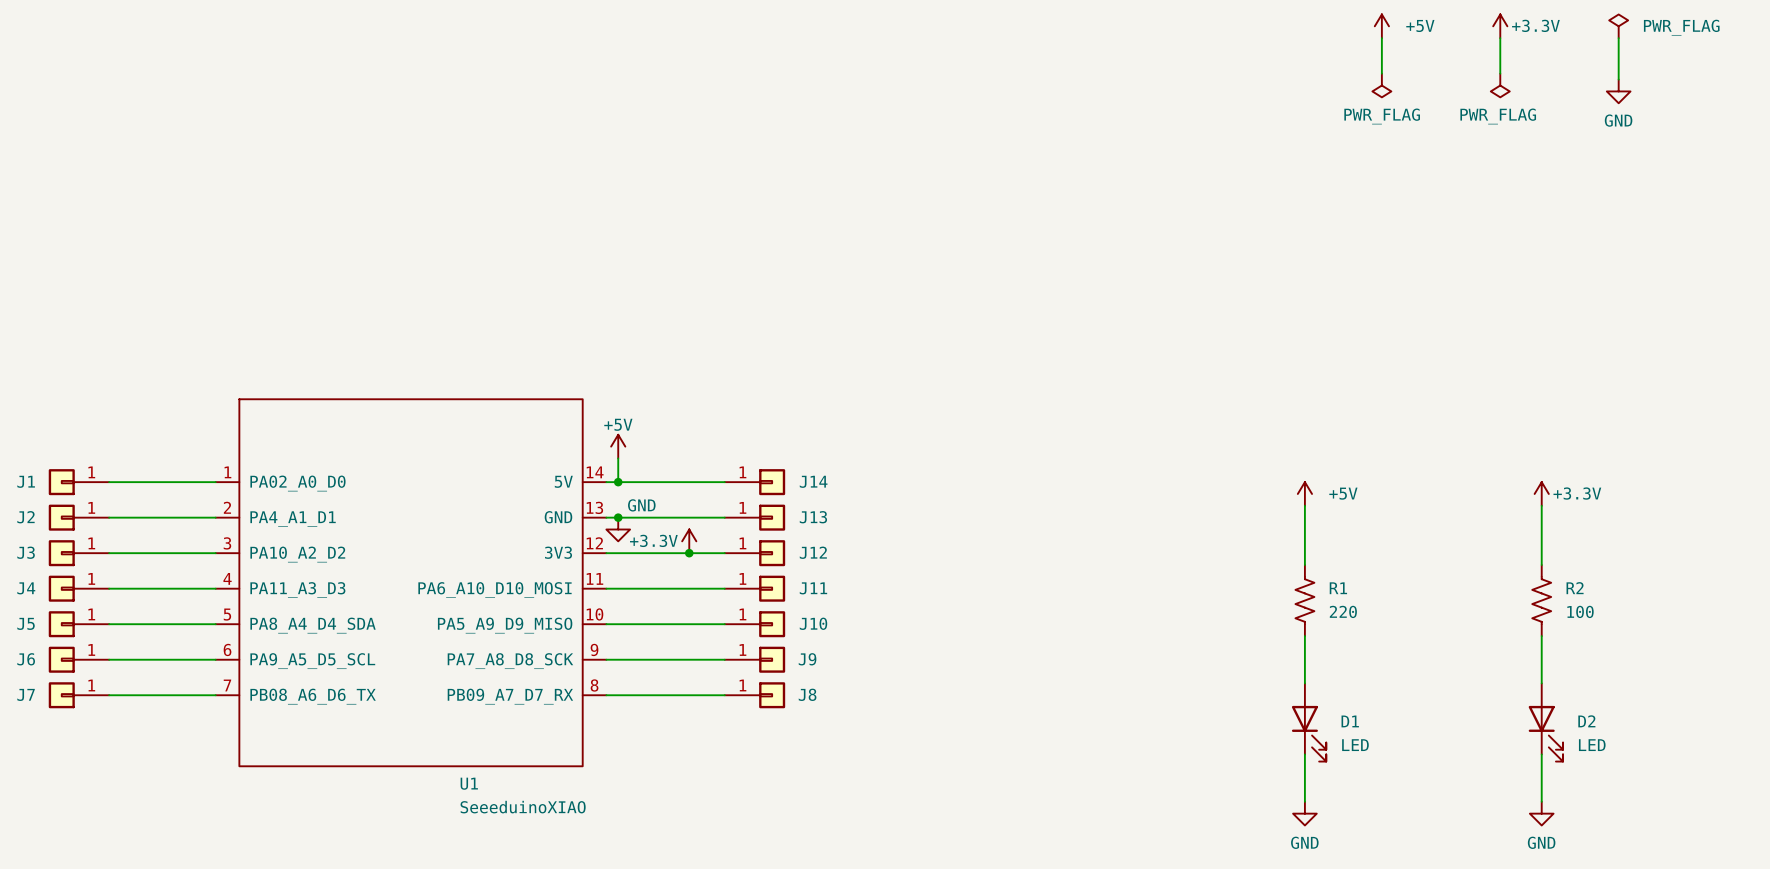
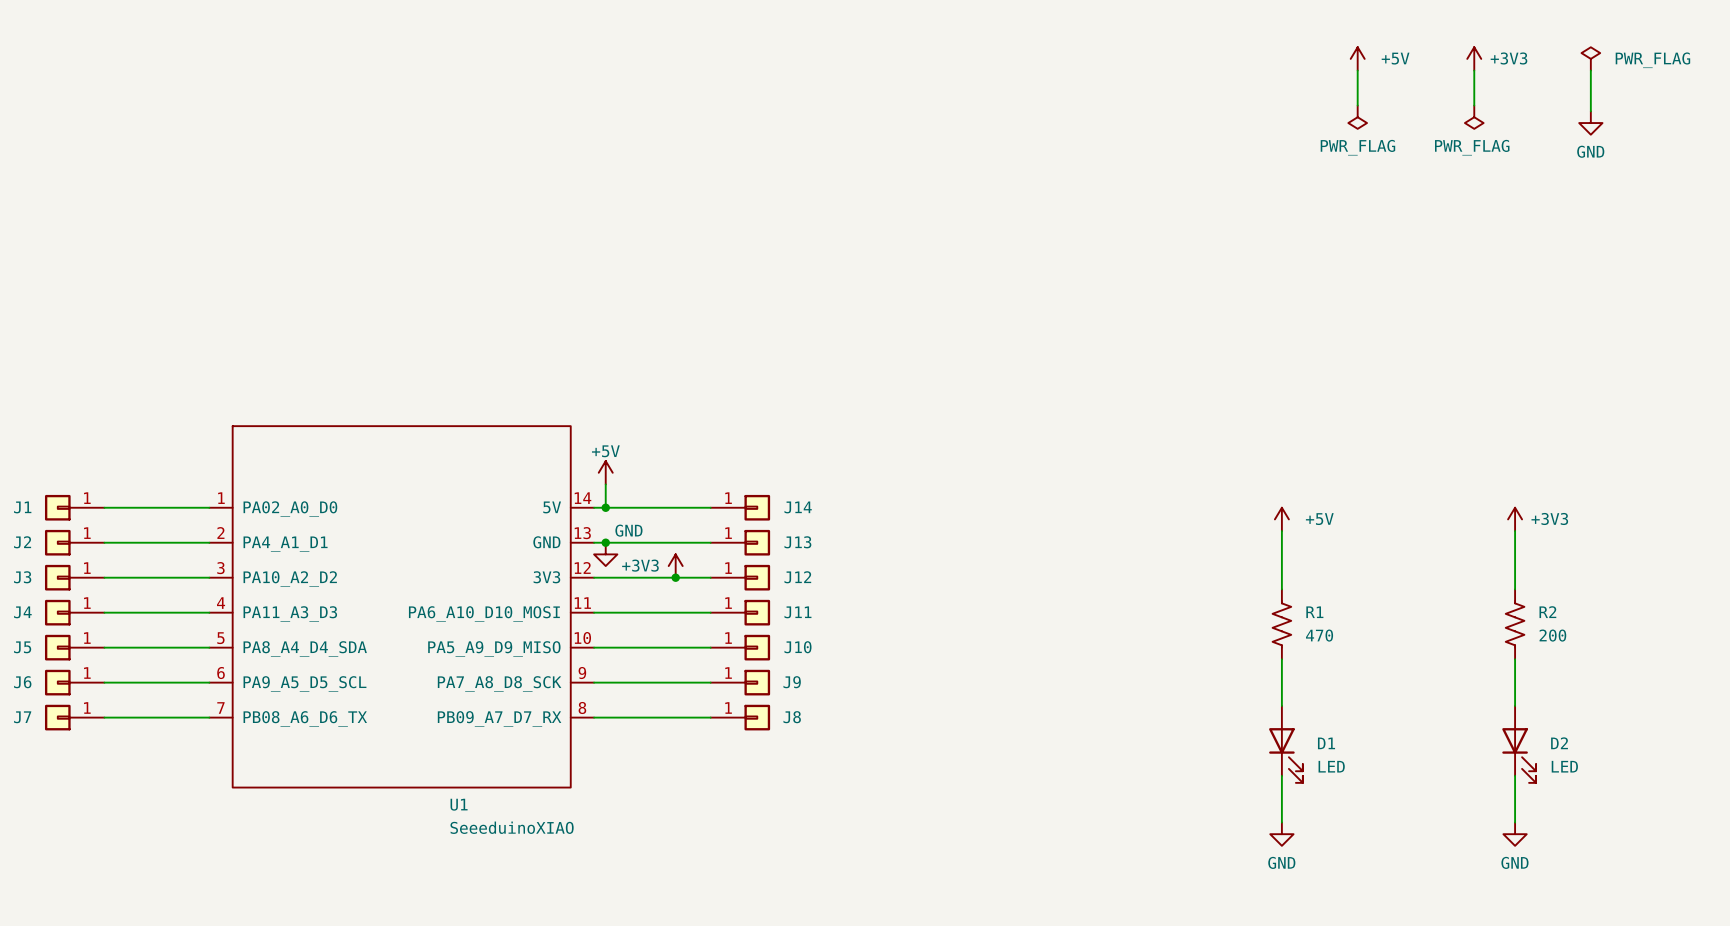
power symbol: +3.3V (1500, 26) -> +3V3 (1474, 58)
power symbol: +3.3V (1541, 493) -> +3V3 (1515, 519)
power symbol: +3.3V (689, 541) -> +3V3 (675, 566)
R1 value: 220 (1343, 611) -> 470 (1319, 635)
R2 value: 100 (1580, 611) -> 200 (1552, 635)

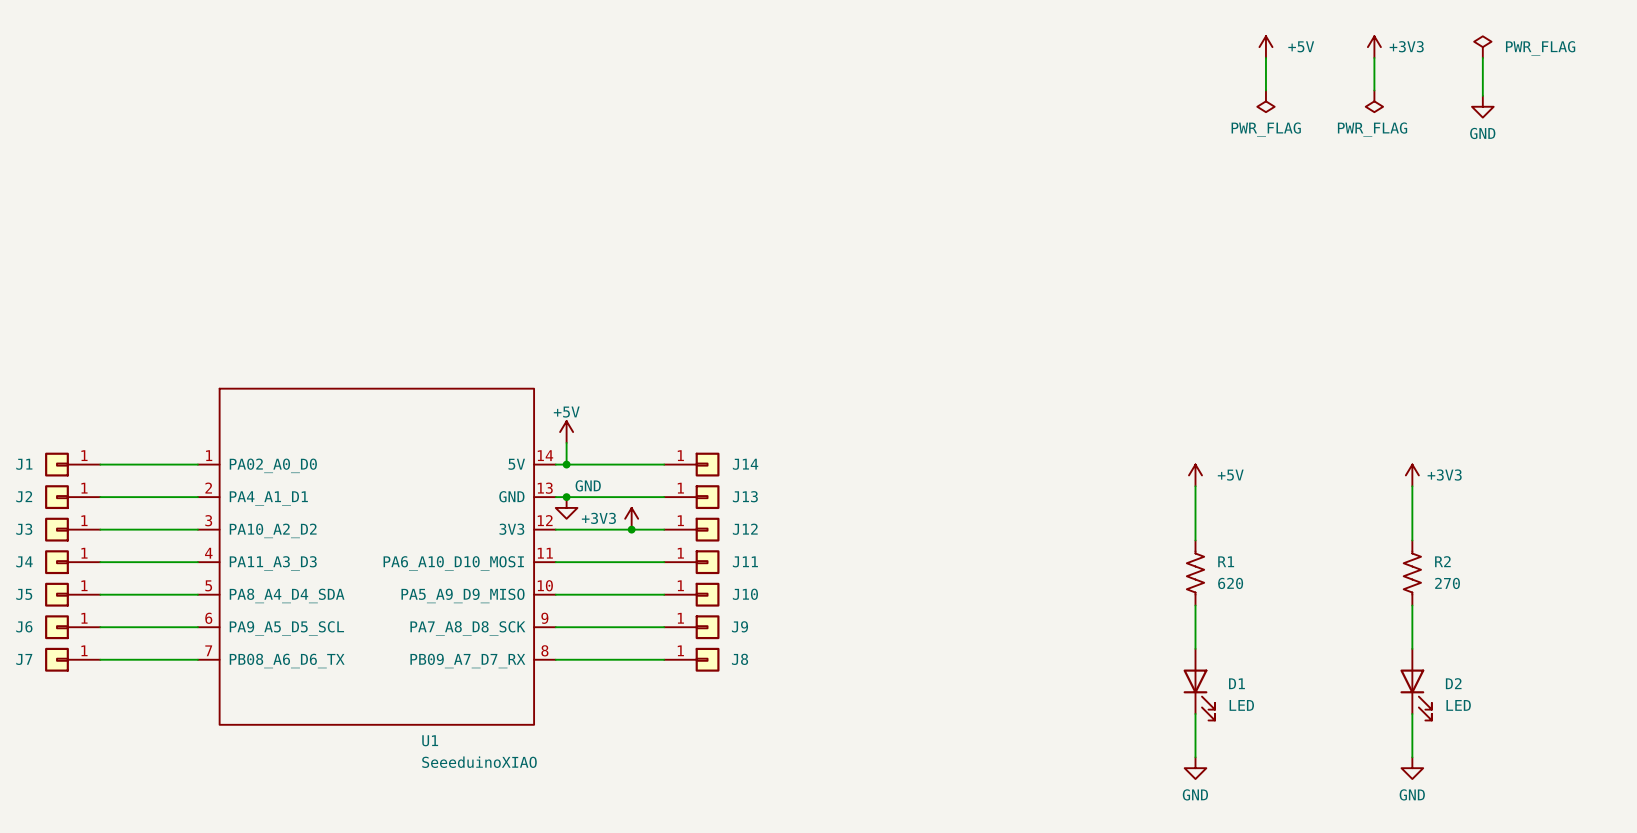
R1 value: 470 (1319, 635) -> 620 (1230, 583)
R2 value: 200 (1552, 635) -> 270 (1447, 583)

